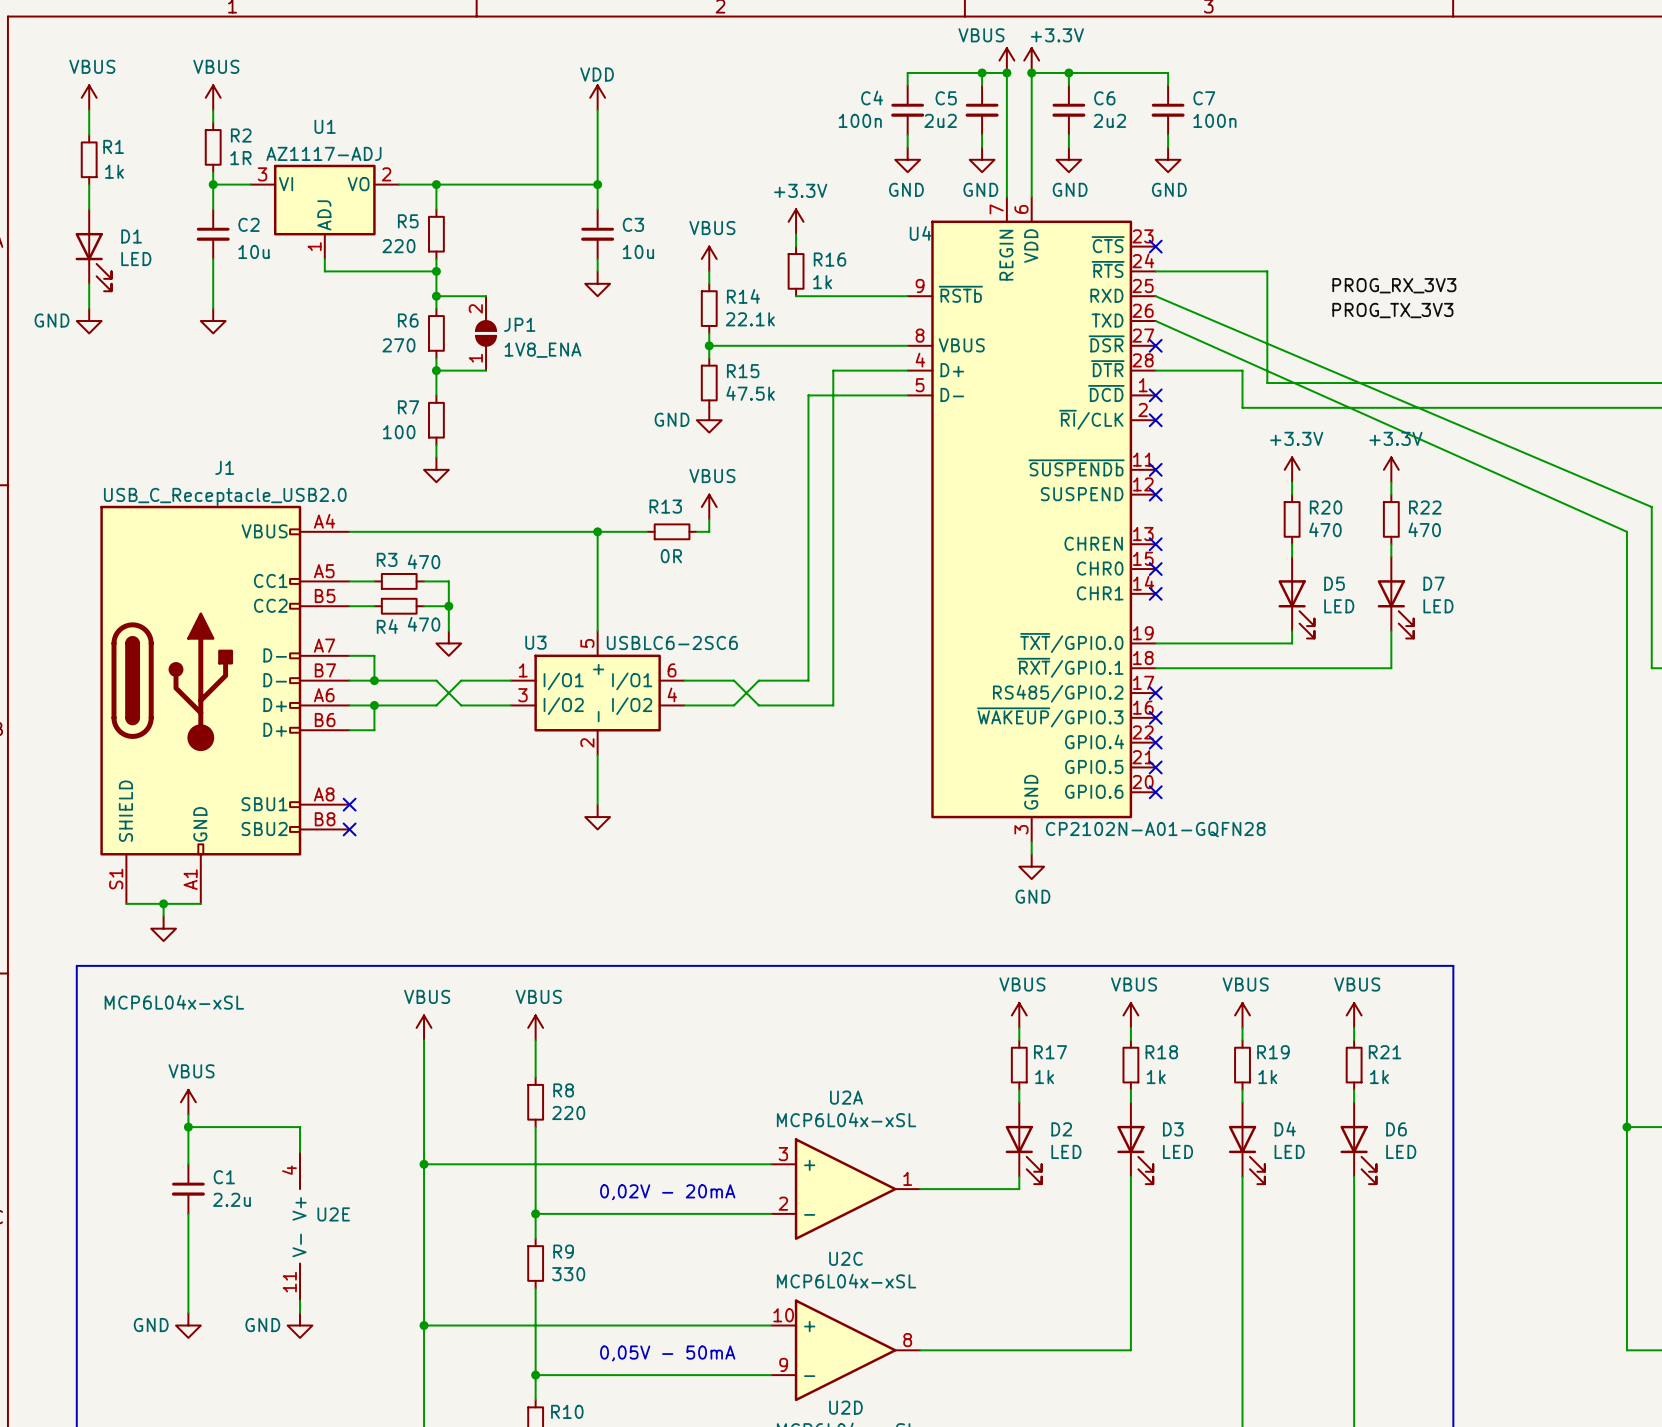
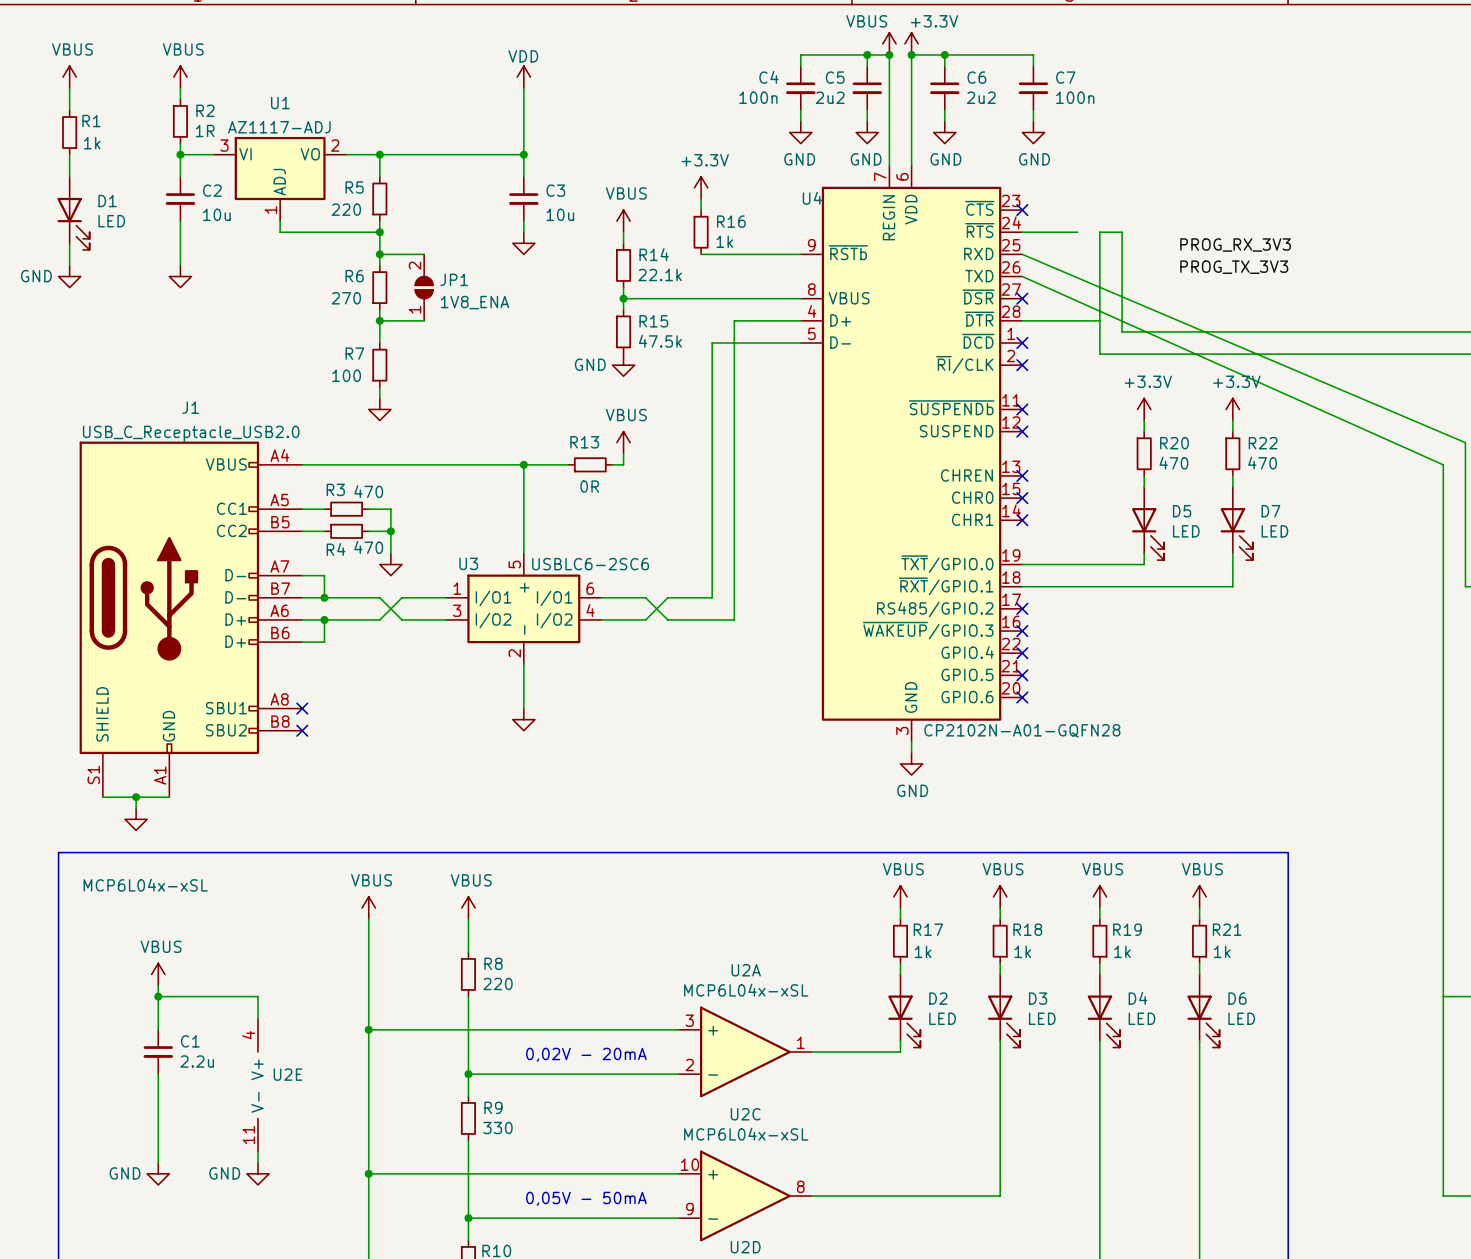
wire: (1217, 271) (1242, 271) -> (1099, 320) (1099, 232)
junction: (1626, 1127) -> none

